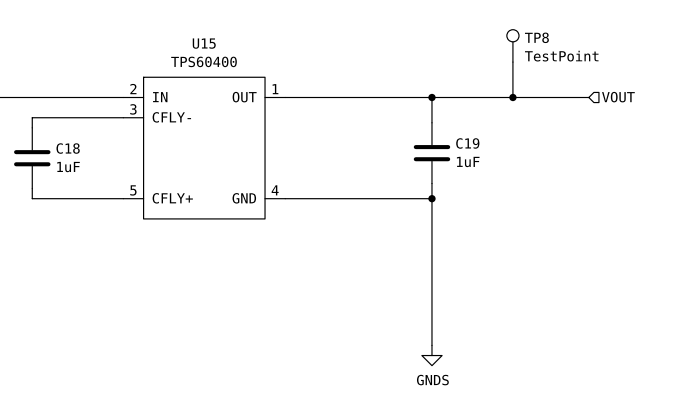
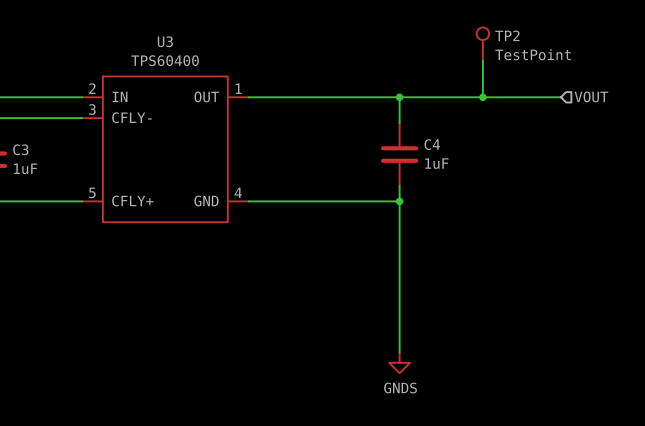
TP8 name: TP8 (536, 37) -> TP2 (507, 35)
U15 name: U15 (204, 43) -> U3 (165, 41)
C19 name: C19 (467, 143) -> C4 (432, 144)
C18 name: C18 (68, 148) -> C3 (20, 149)

